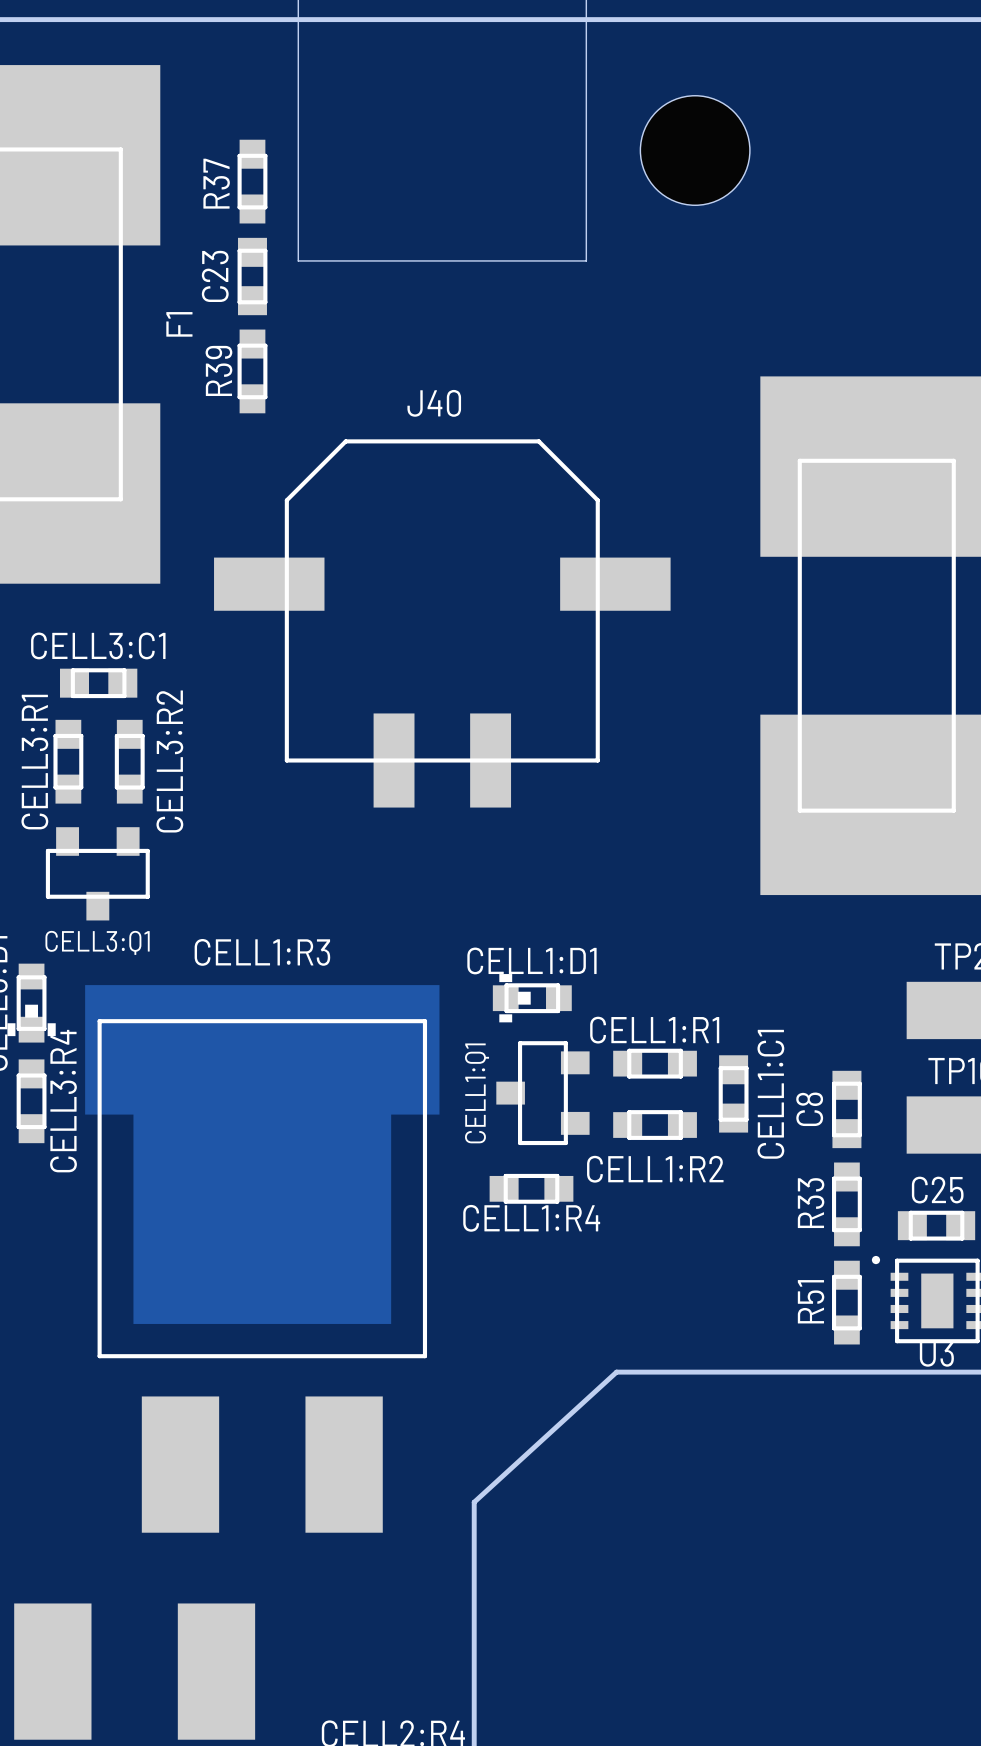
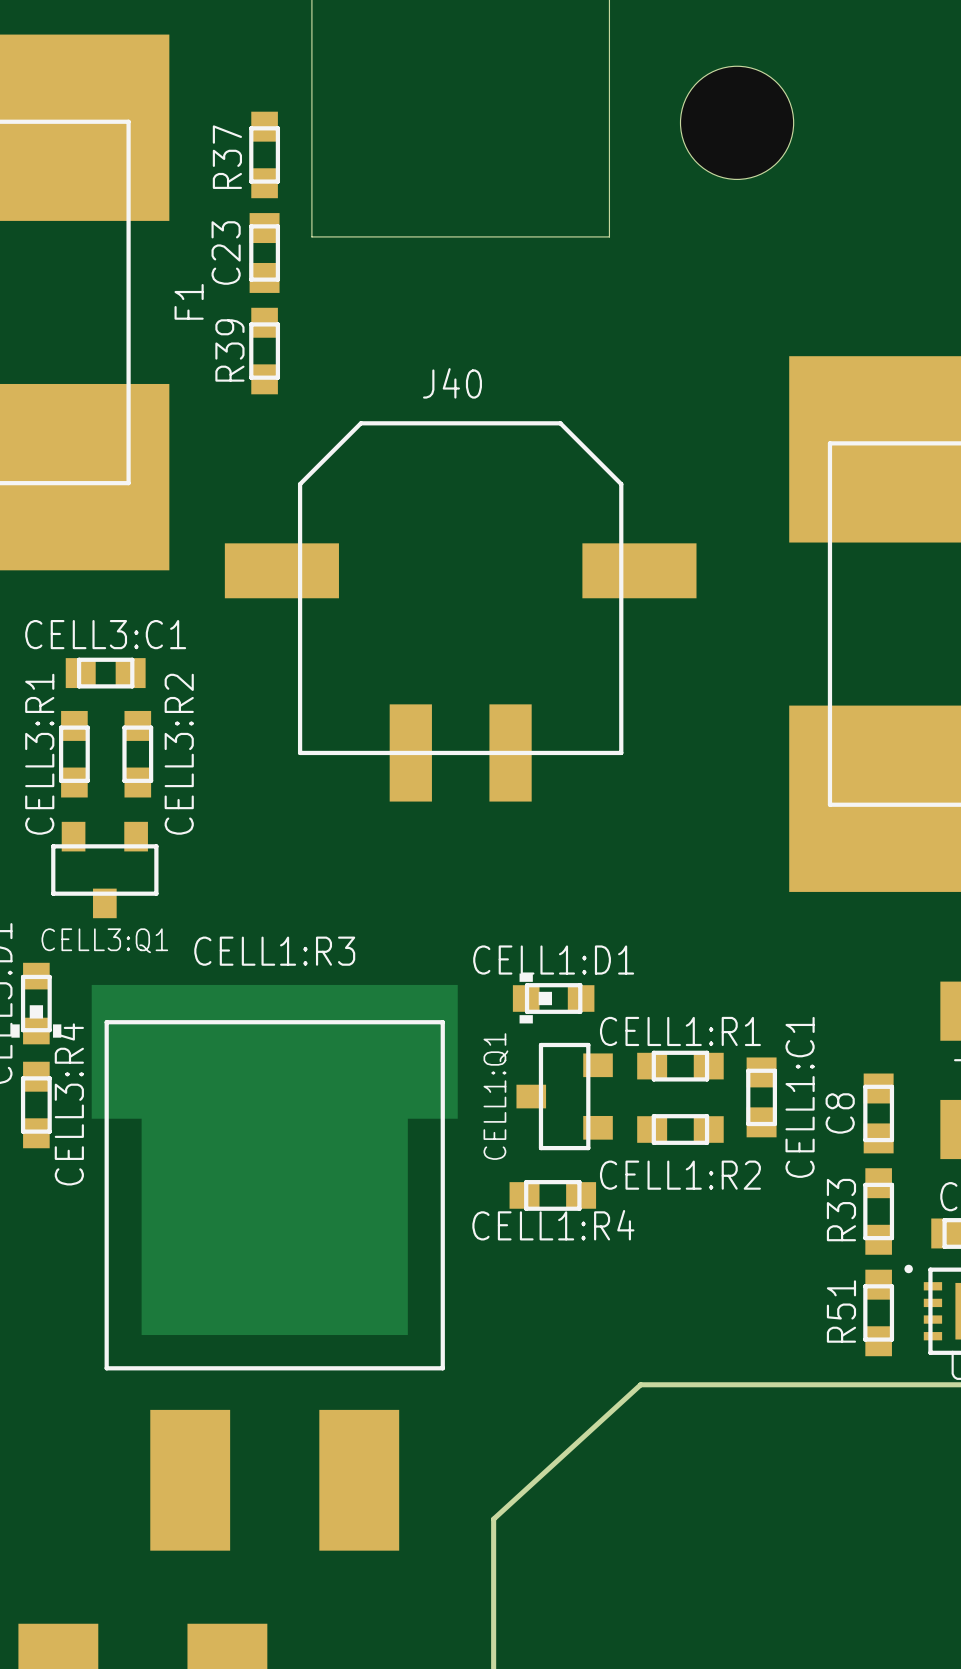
part position: (695, 150) -> (737, 122)

